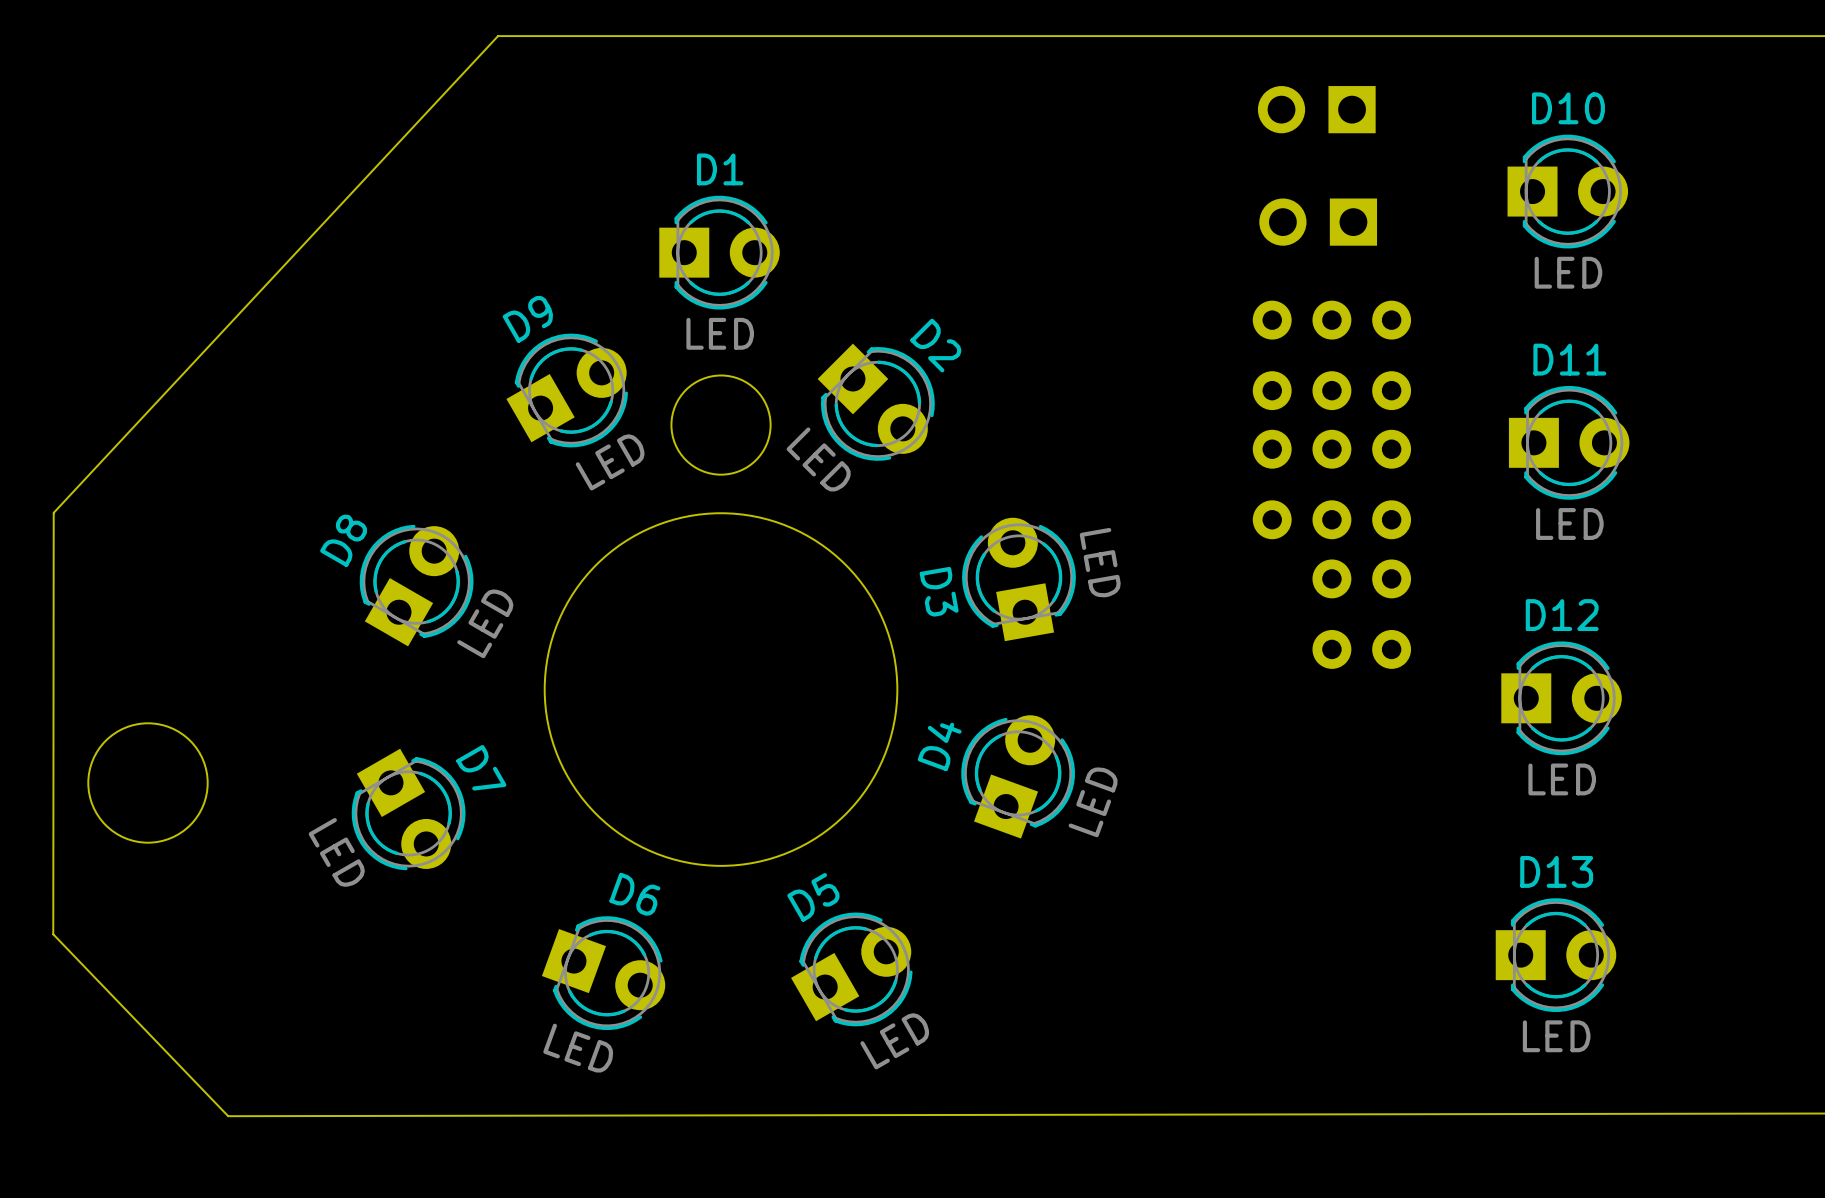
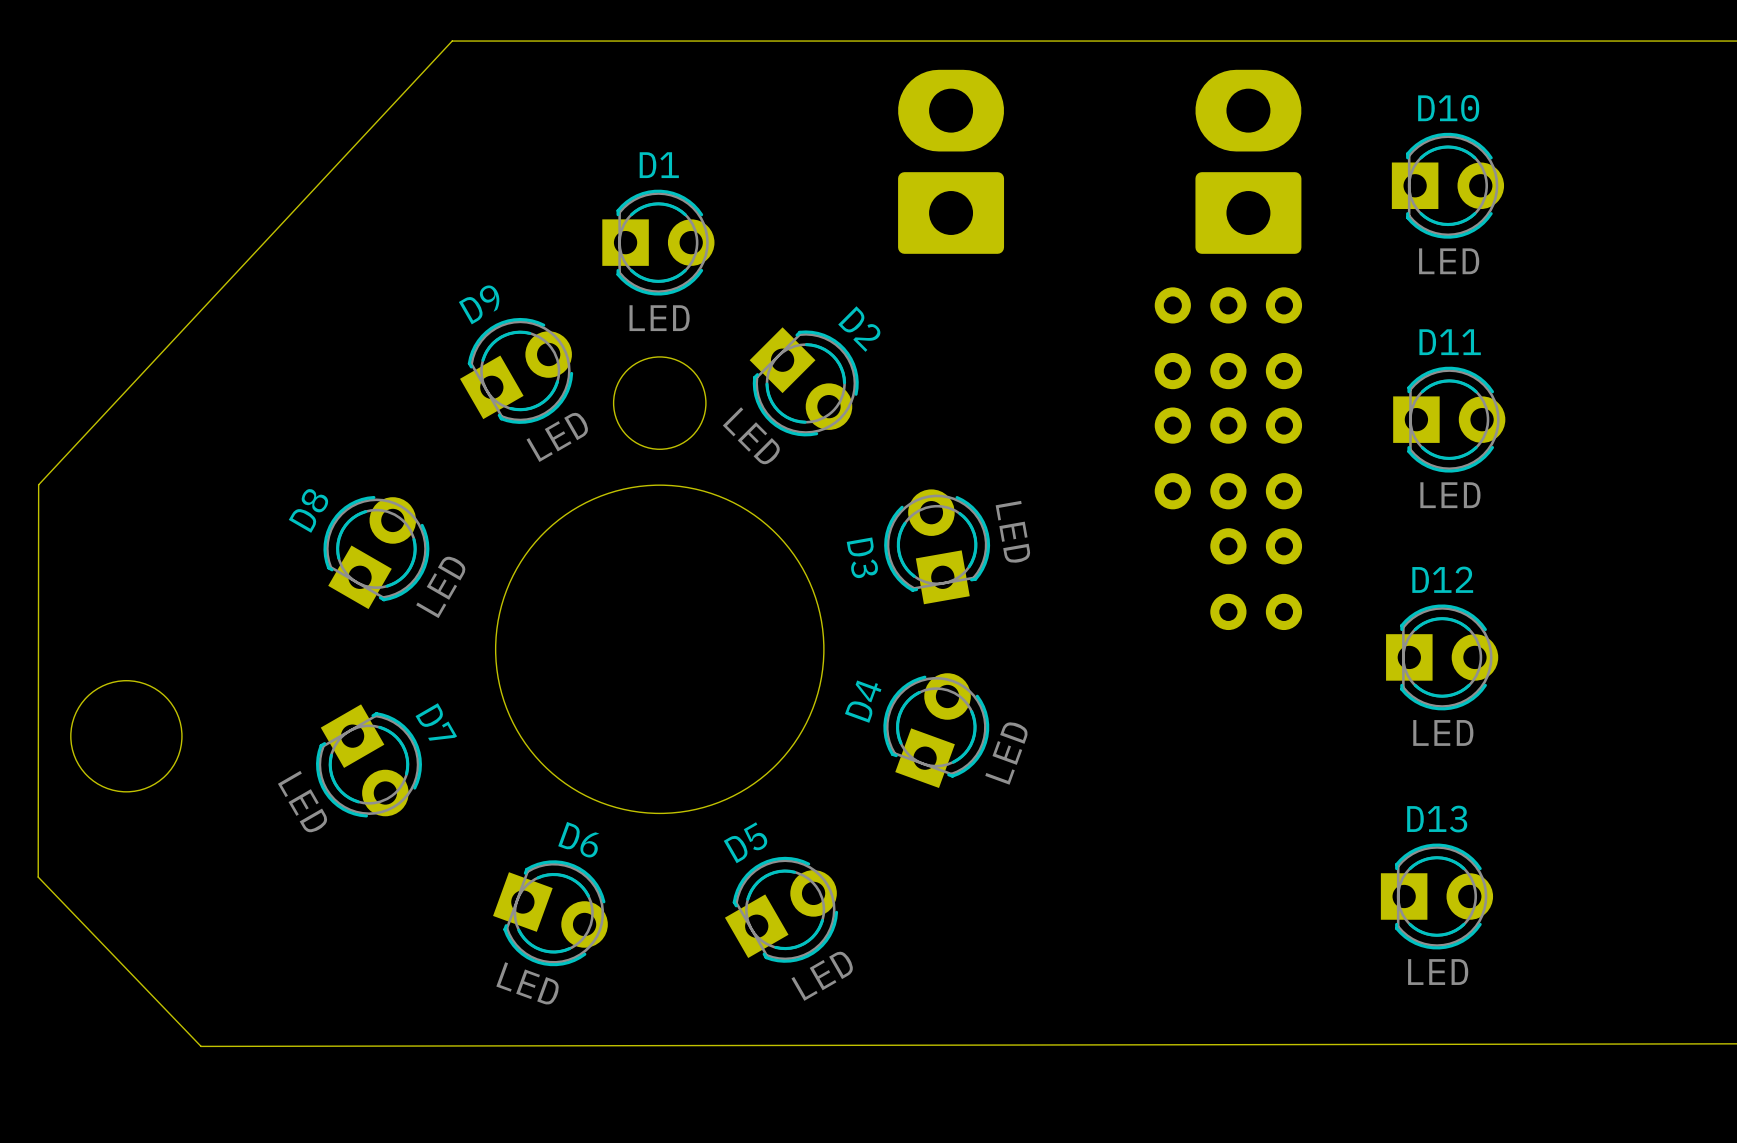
part: (1316, 109) -> none
part: none -> (951, 161)
part: none -> (1248, 161)
part: (1318, 222) -> none

